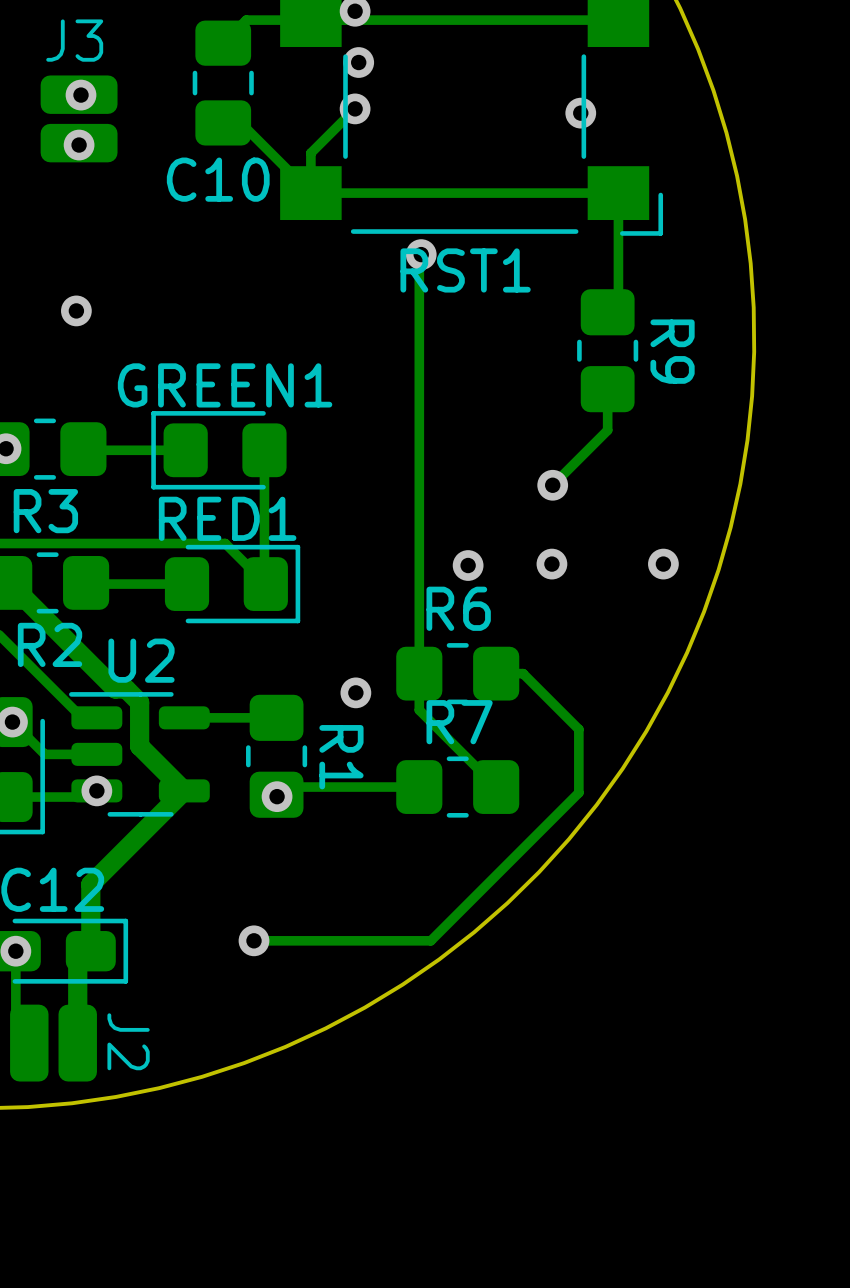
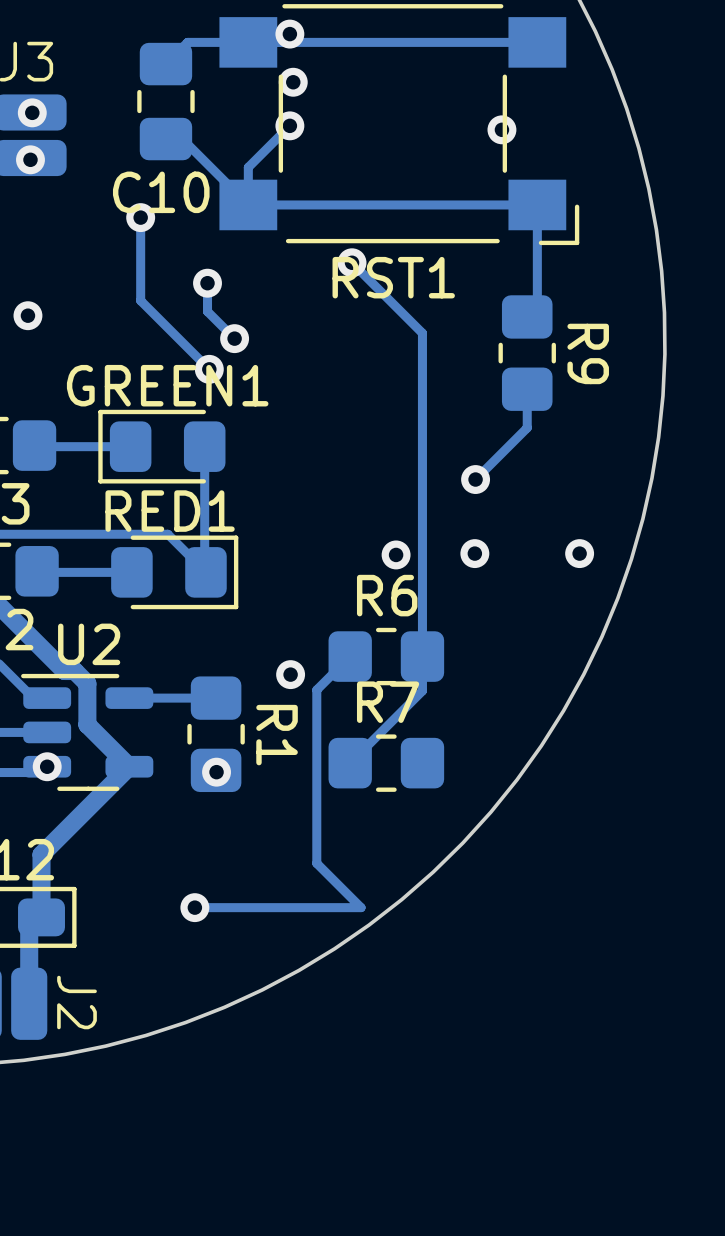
track: none -> (140, 217) (140, 300) (209, 369)
via: none -> (140, 217)
track: (419, 256) (419, 710) (496, 787) -> none
track: none -> (207, 283) (207, 311) (234, 338)
via: none -> (207, 283)
via: none -> (234, 338)
via: none -> (209, 369)
track: (496, 673) (523, 673) (578, 729) (578, 792) (430, 940) -> (350, 656) (316, 689) (316, 863) (361, 907)
track: (419, 787) (286, 787) -> (350, 763) (422, 690) (422, 333) (352, 262)

